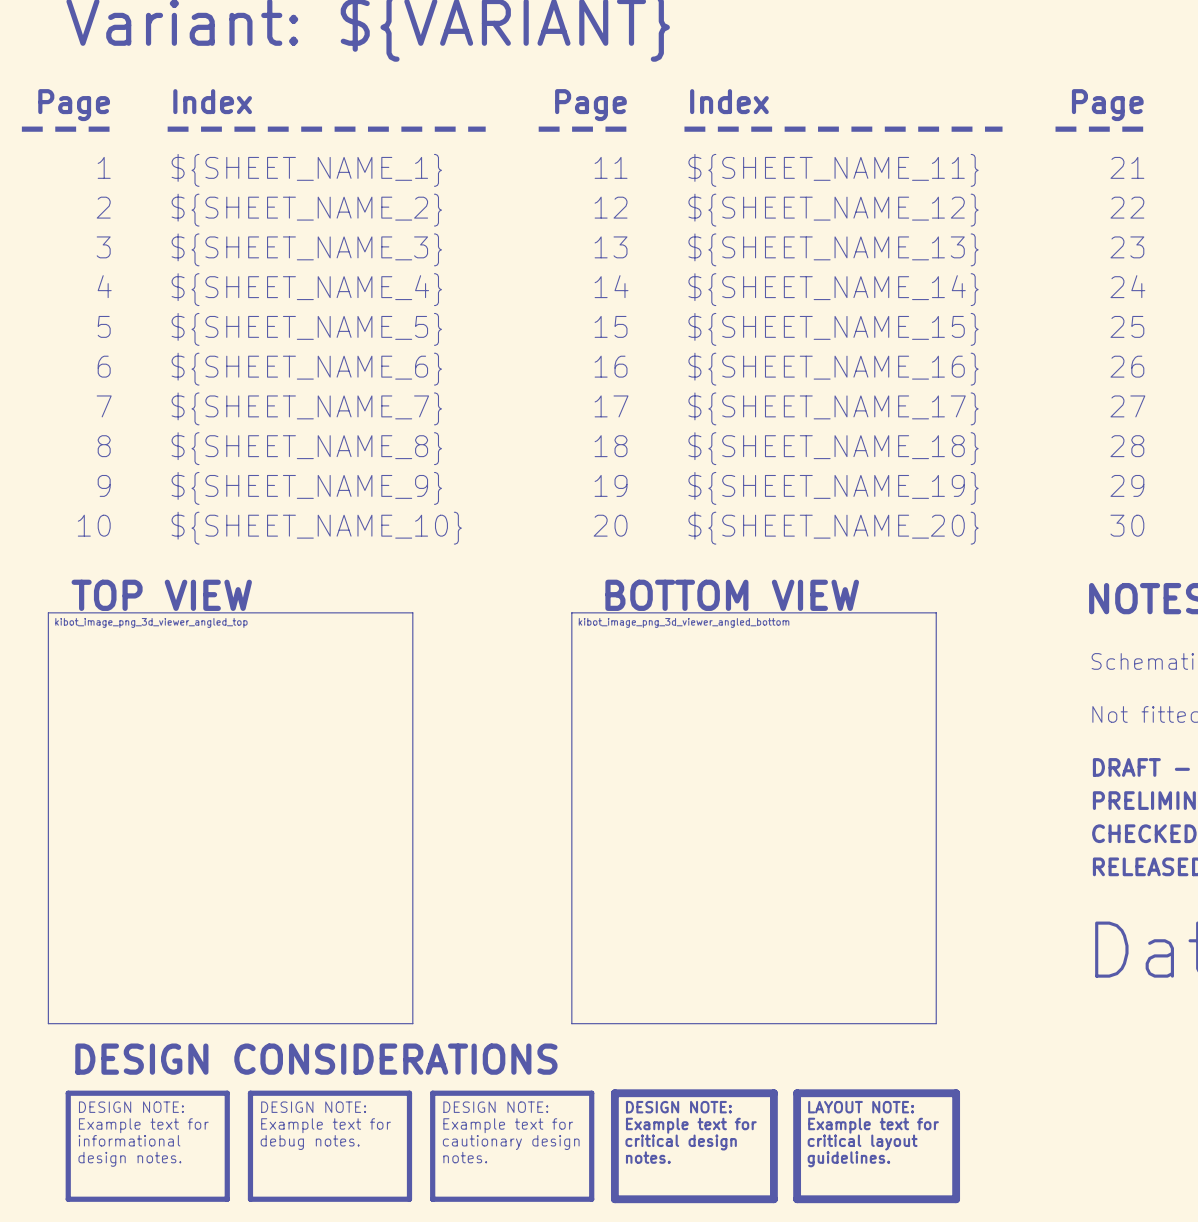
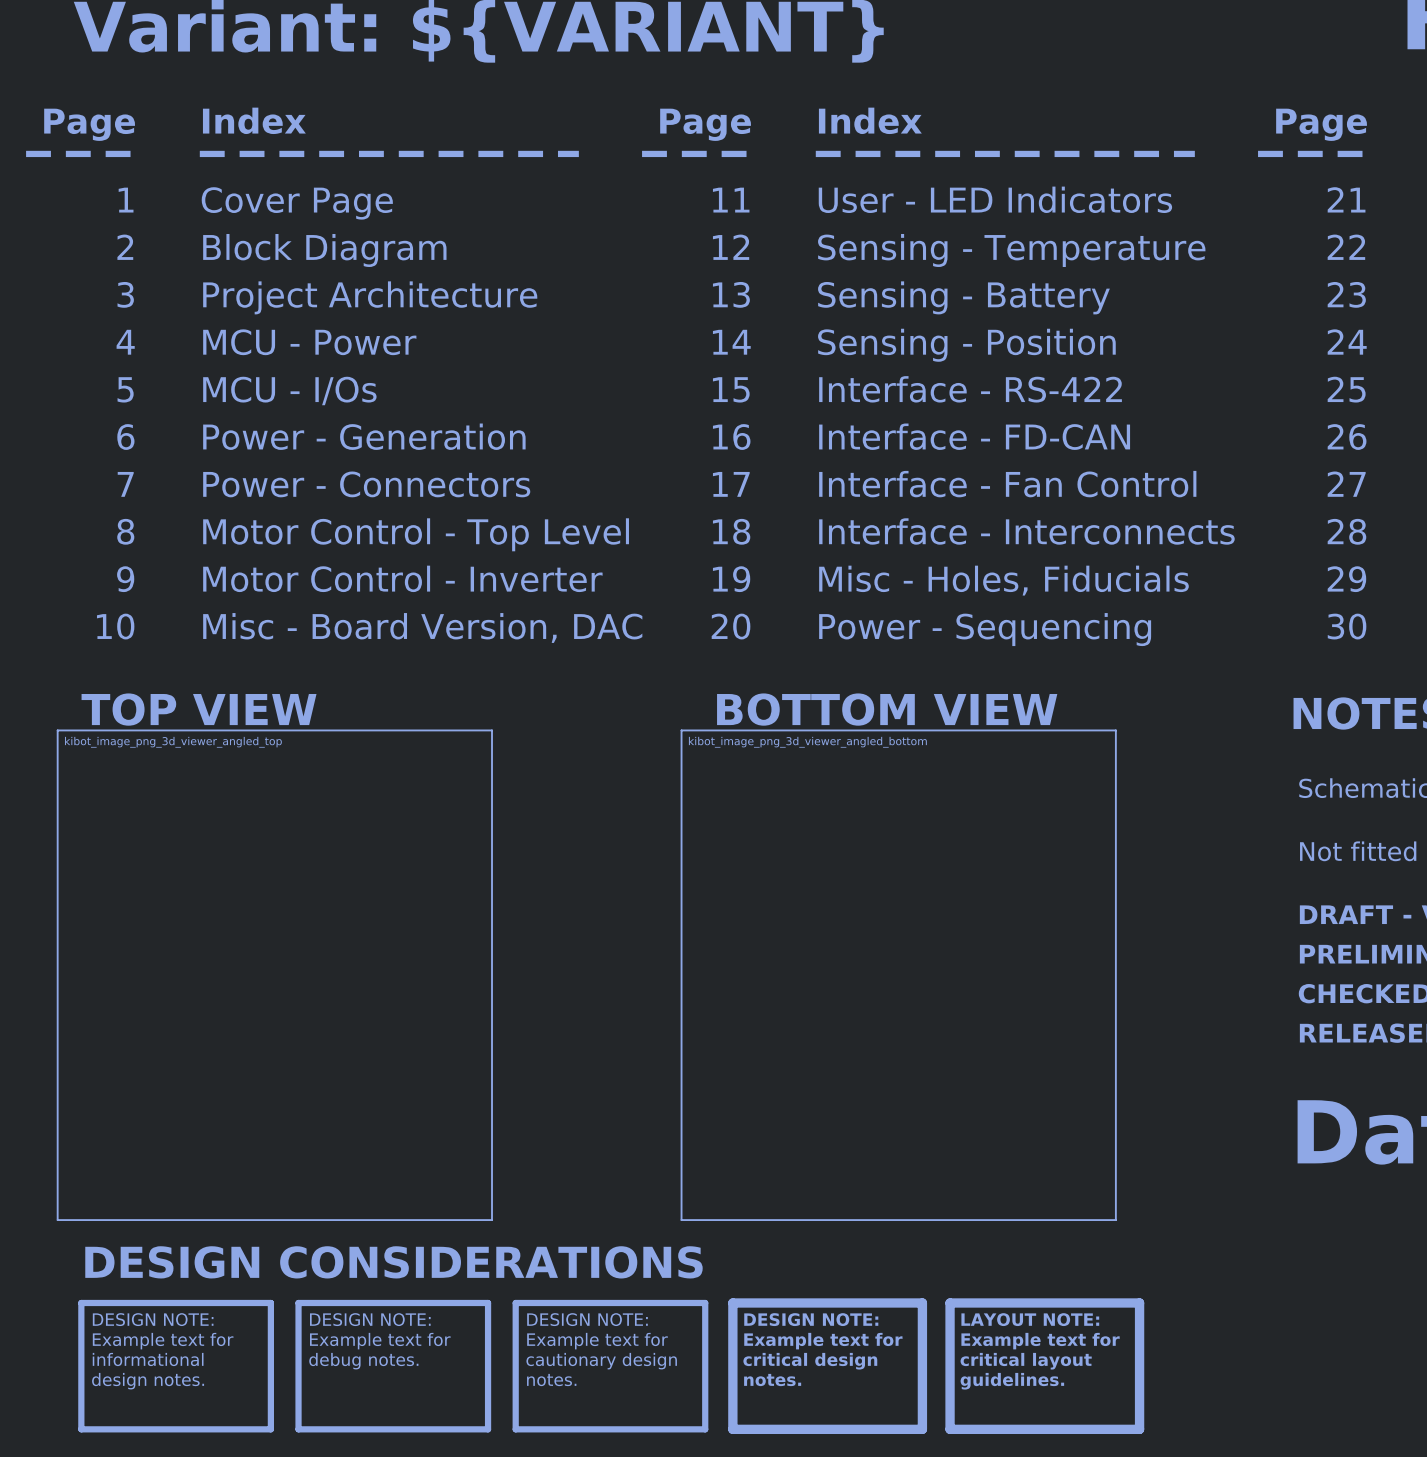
text: ${SHEET_NAME_1} (306, 170) -> Cover Page (297, 203)
text: ${SHEET_NAME_11} (833, 170) -> User - LED Indicators (995, 199)
text: ${SHEET_NAME_2} (306, 210) -> Block Diagram (324, 250)
text: ${SHEET_NAME_12} (833, 210) -> Sensing - Temperature (1011, 250)
text: ${SHEET_NAME_3} (306, 249) -> Project Architecture (370, 297)
text: ${SHEET_NAME_13} (833, 249) -> Sensing - Battery (963, 297)
text: ${SHEET_NAME_4} (306, 289) -> MCU - Power (309, 342)
text: ${SHEET_NAME_14} (833, 289) -> Sensing - Position (966, 345)
text: ${SHEET_NAME_5} (306, 329) -> MCU - I/Os (289, 390)
text: ${SHEET_NAME_15} (833, 329) -> Interface - RS-422 (970, 389)
text: ${SHEET_NAME_6} (306, 369) -> Power - Generation (364, 436)
text: ${SHEET_NAME_16} (833, 369) -> Interface - FD-CAN (974, 436)
text: ${SHEET_NAME_7} (306, 408) -> Power - Connectors (366, 484)
text: ${SHEET_NAME_17} (833, 408) -> Interface - Fan Control (1007, 484)
text: ${SHEET_NAME_8} (306, 448) -> Motor Control - Top Level (416, 534)
text: ${SHEET_NAME_18} (833, 448) -> Interface - Interconnects (1026, 531)
text: ${SHEET_NAME_9} (306, 488) -> Motor Control - Inverter (402, 578)
text: ${SHEET_NAME_19} (833, 488) -> Misc - Holes, Fiducials (1003, 580)
text: ${SHEET_NAME_10} (316, 528) -> Misc - Board Version, DAC (422, 627)
text: ${SHEET_NAME_20} (833, 528) -> Power - Sequencing (985, 629)

